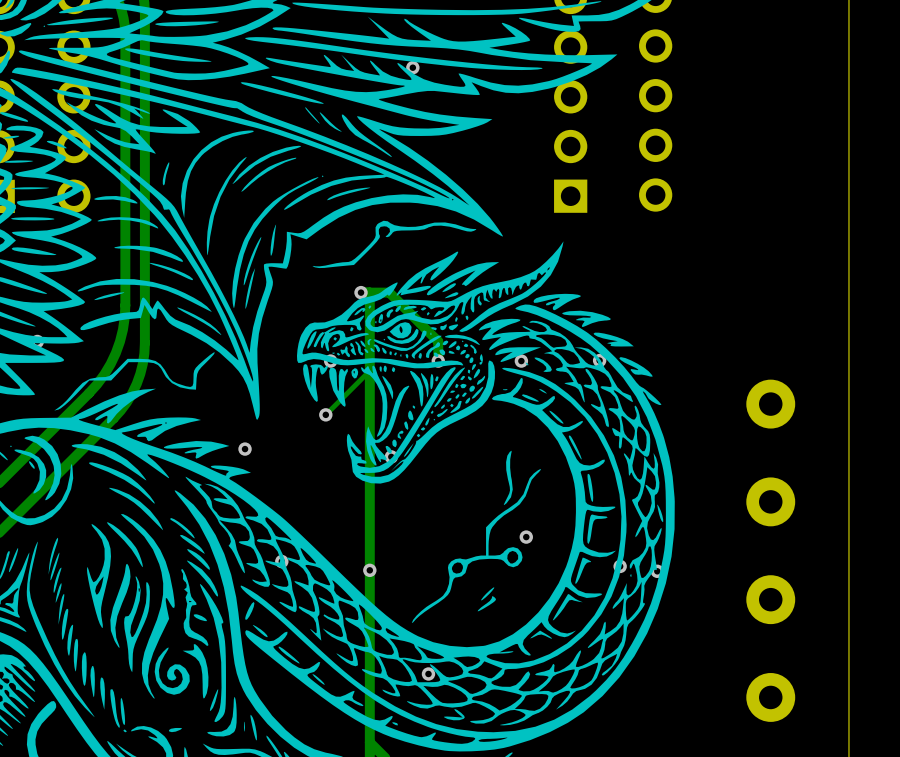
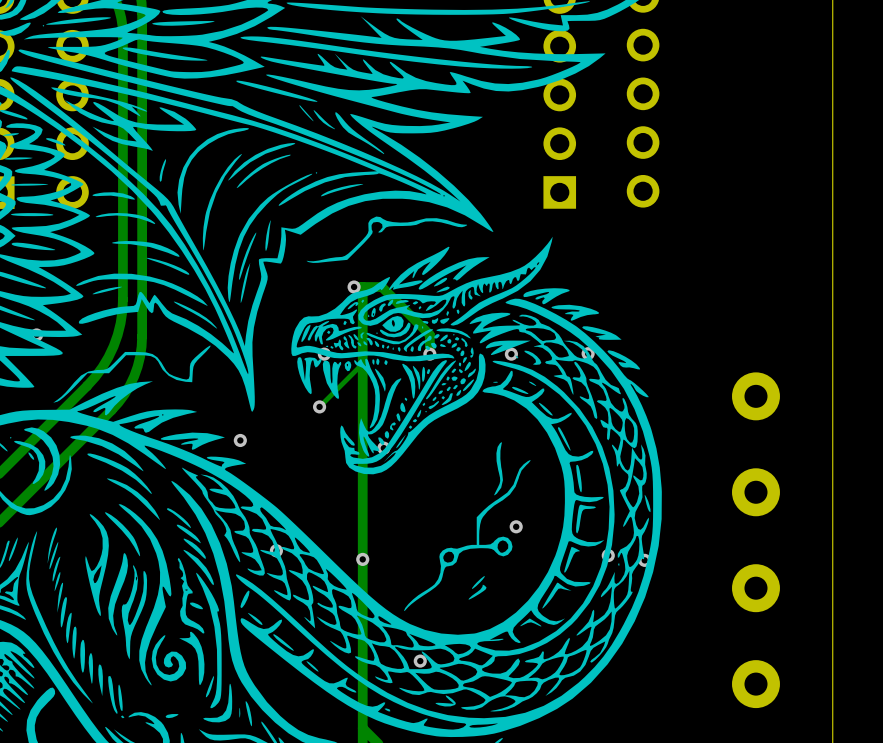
via: (412, 67) -> none

